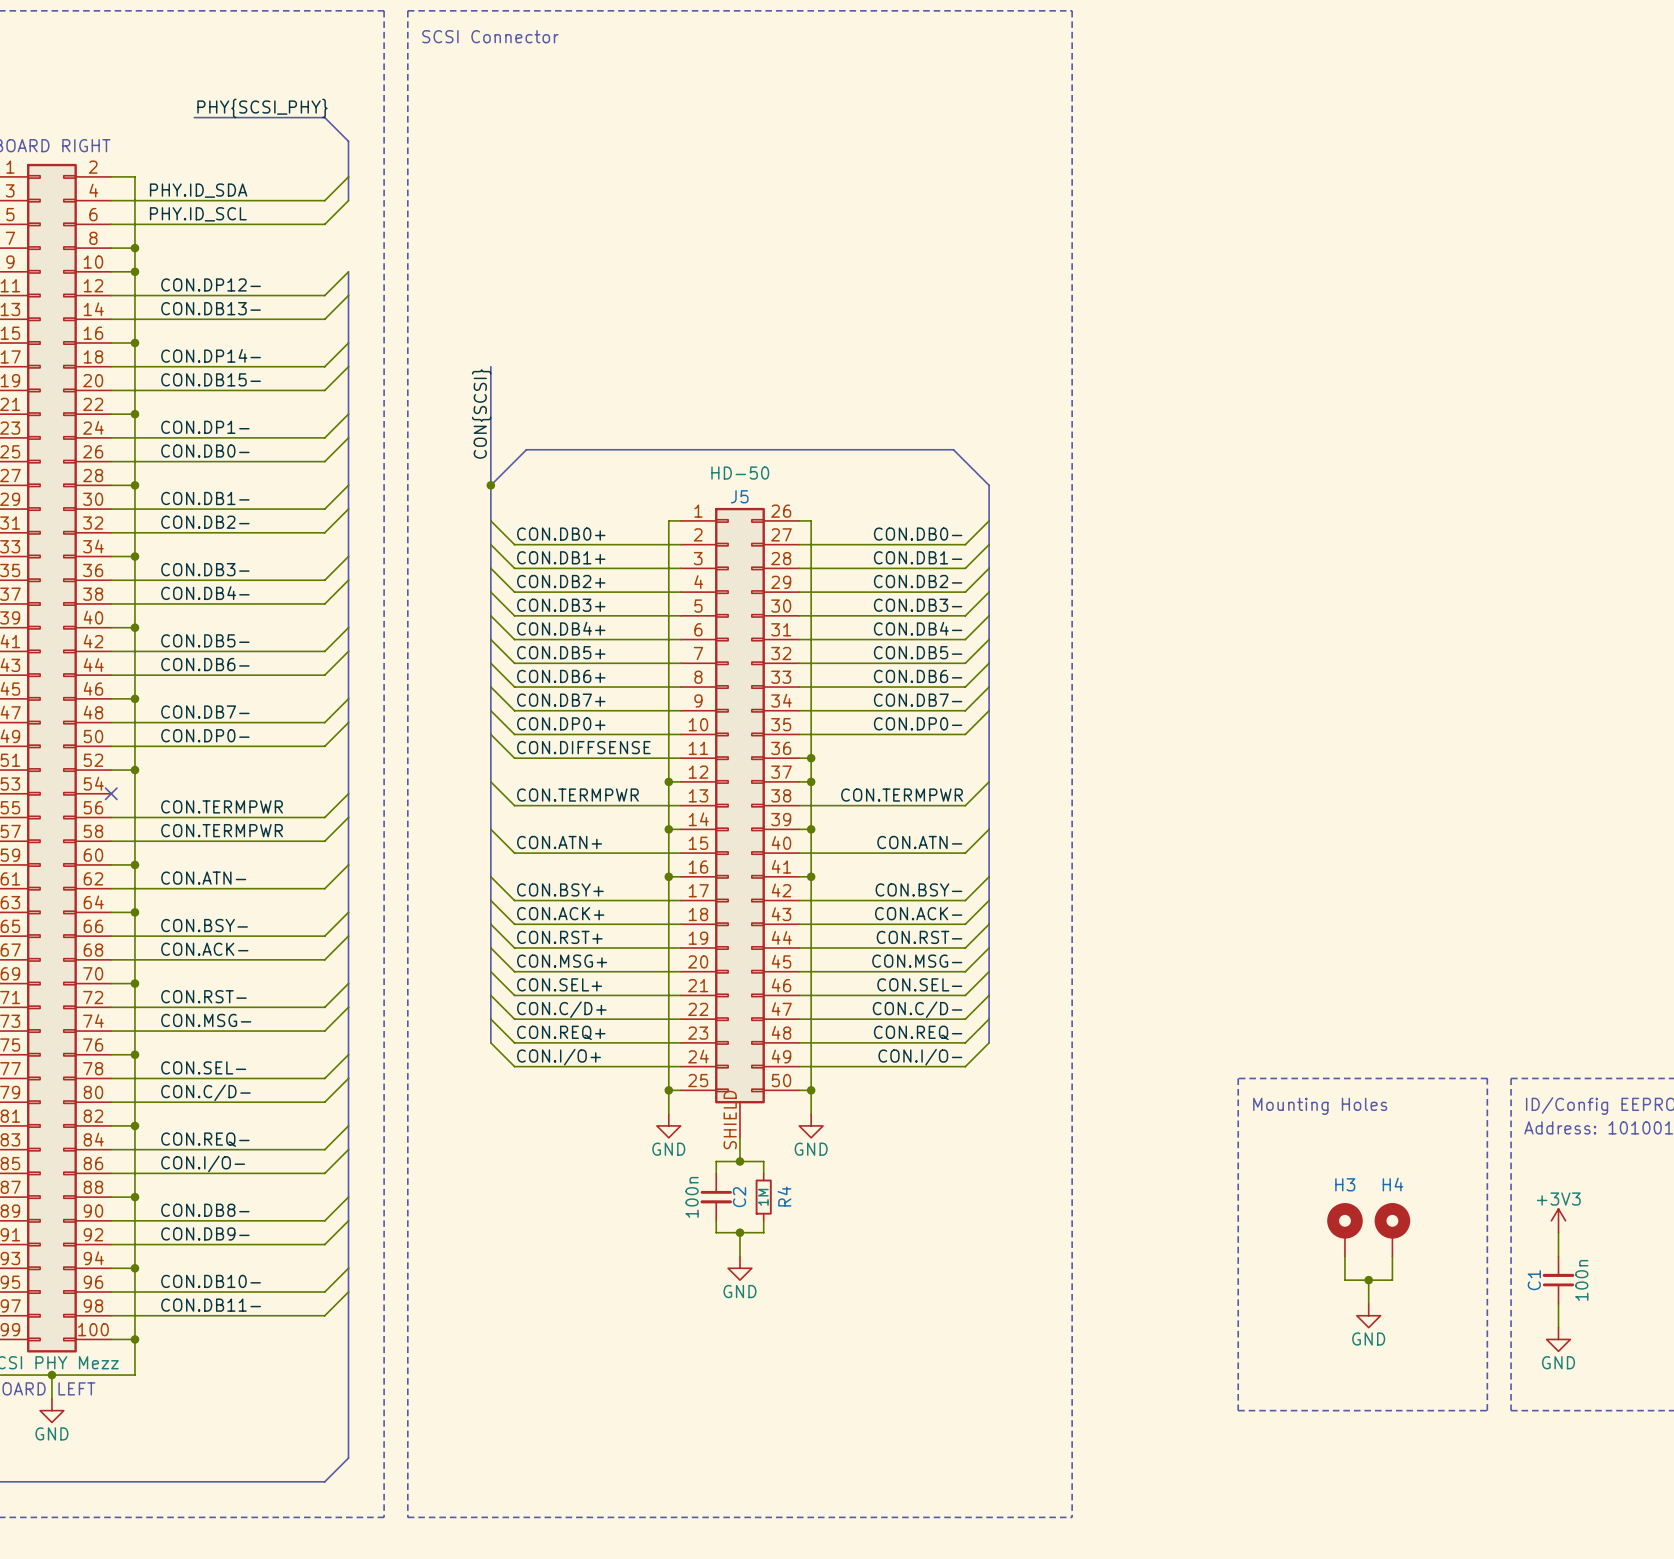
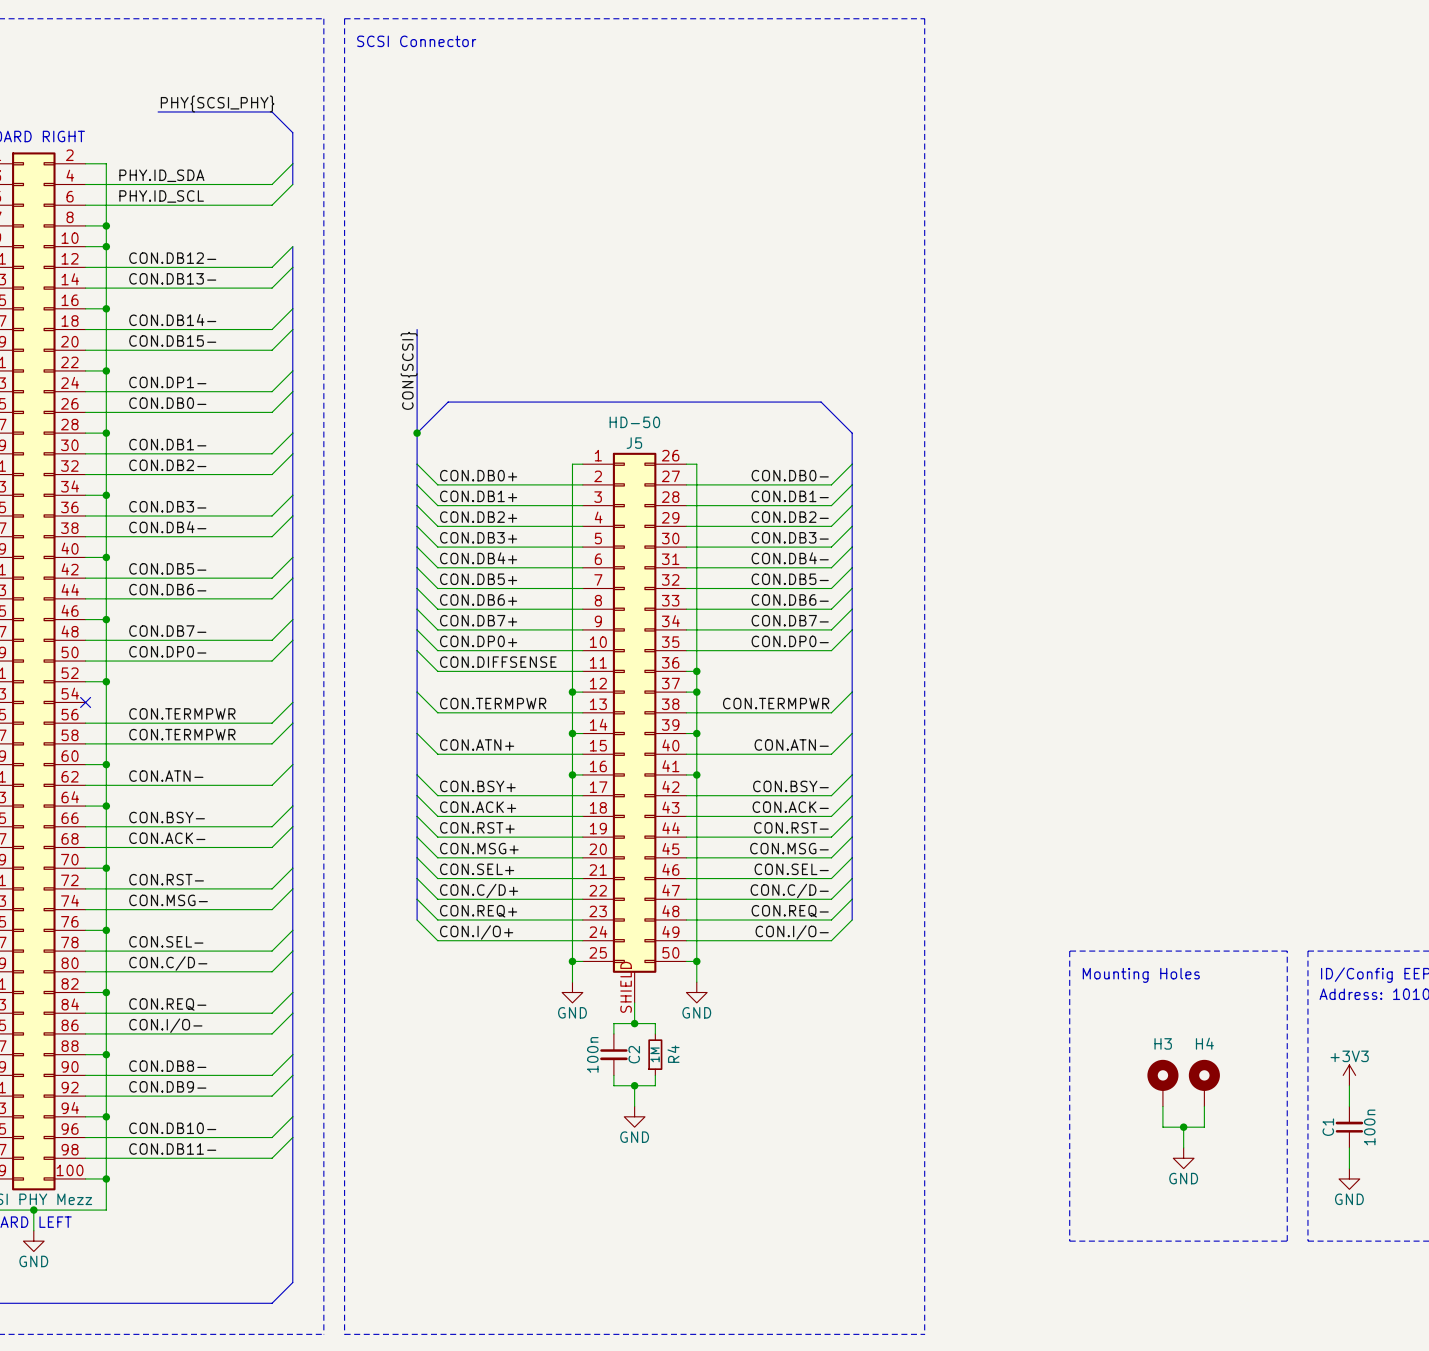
label: CON.DP12- (211, 284) -> CON.DB12- (172, 258)
label: CON.DP14- (211, 355) -> CON.DB14- (172, 320)

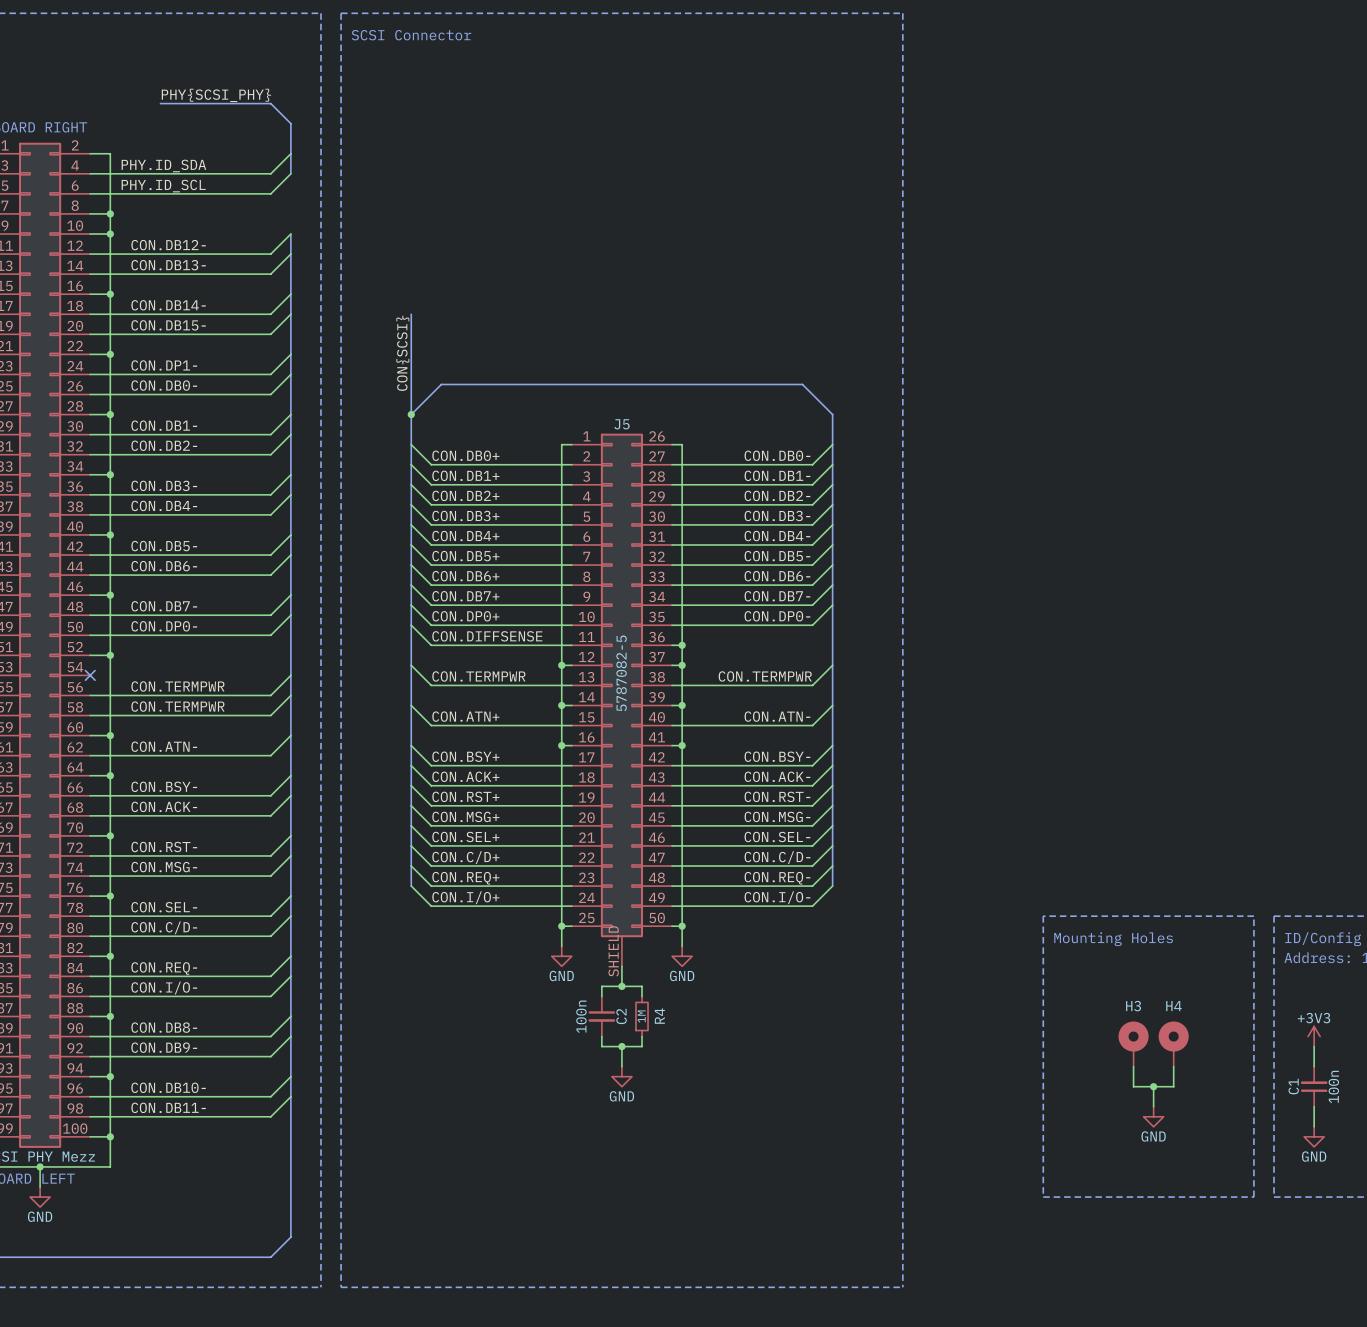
J5 value: HD-50 (634, 422) -> 5787082-5 (621, 673)

